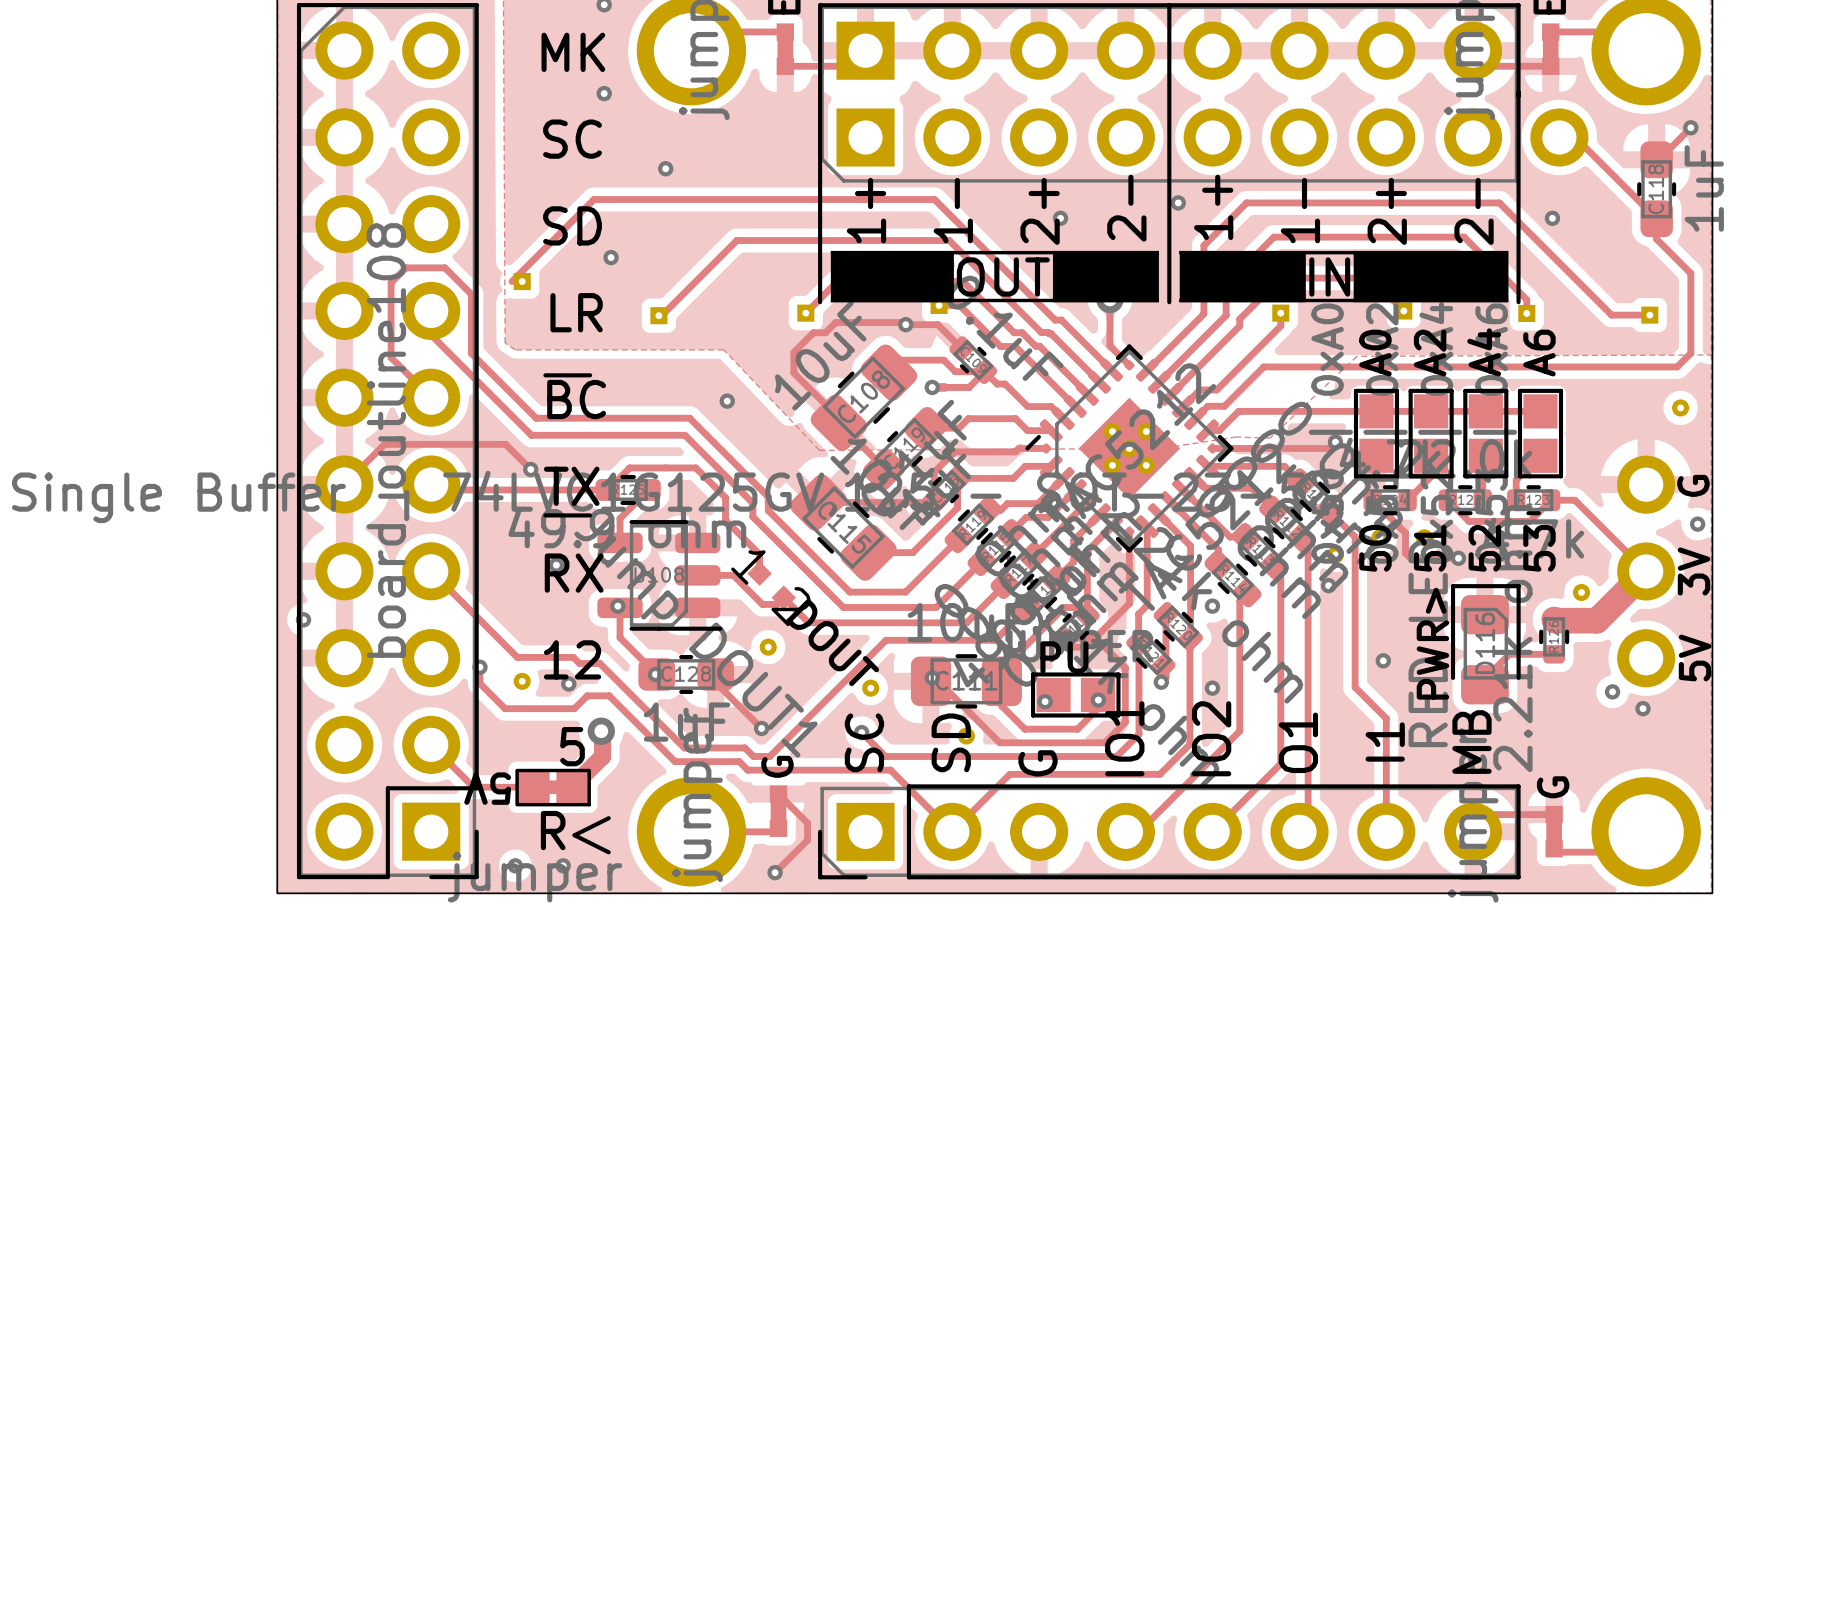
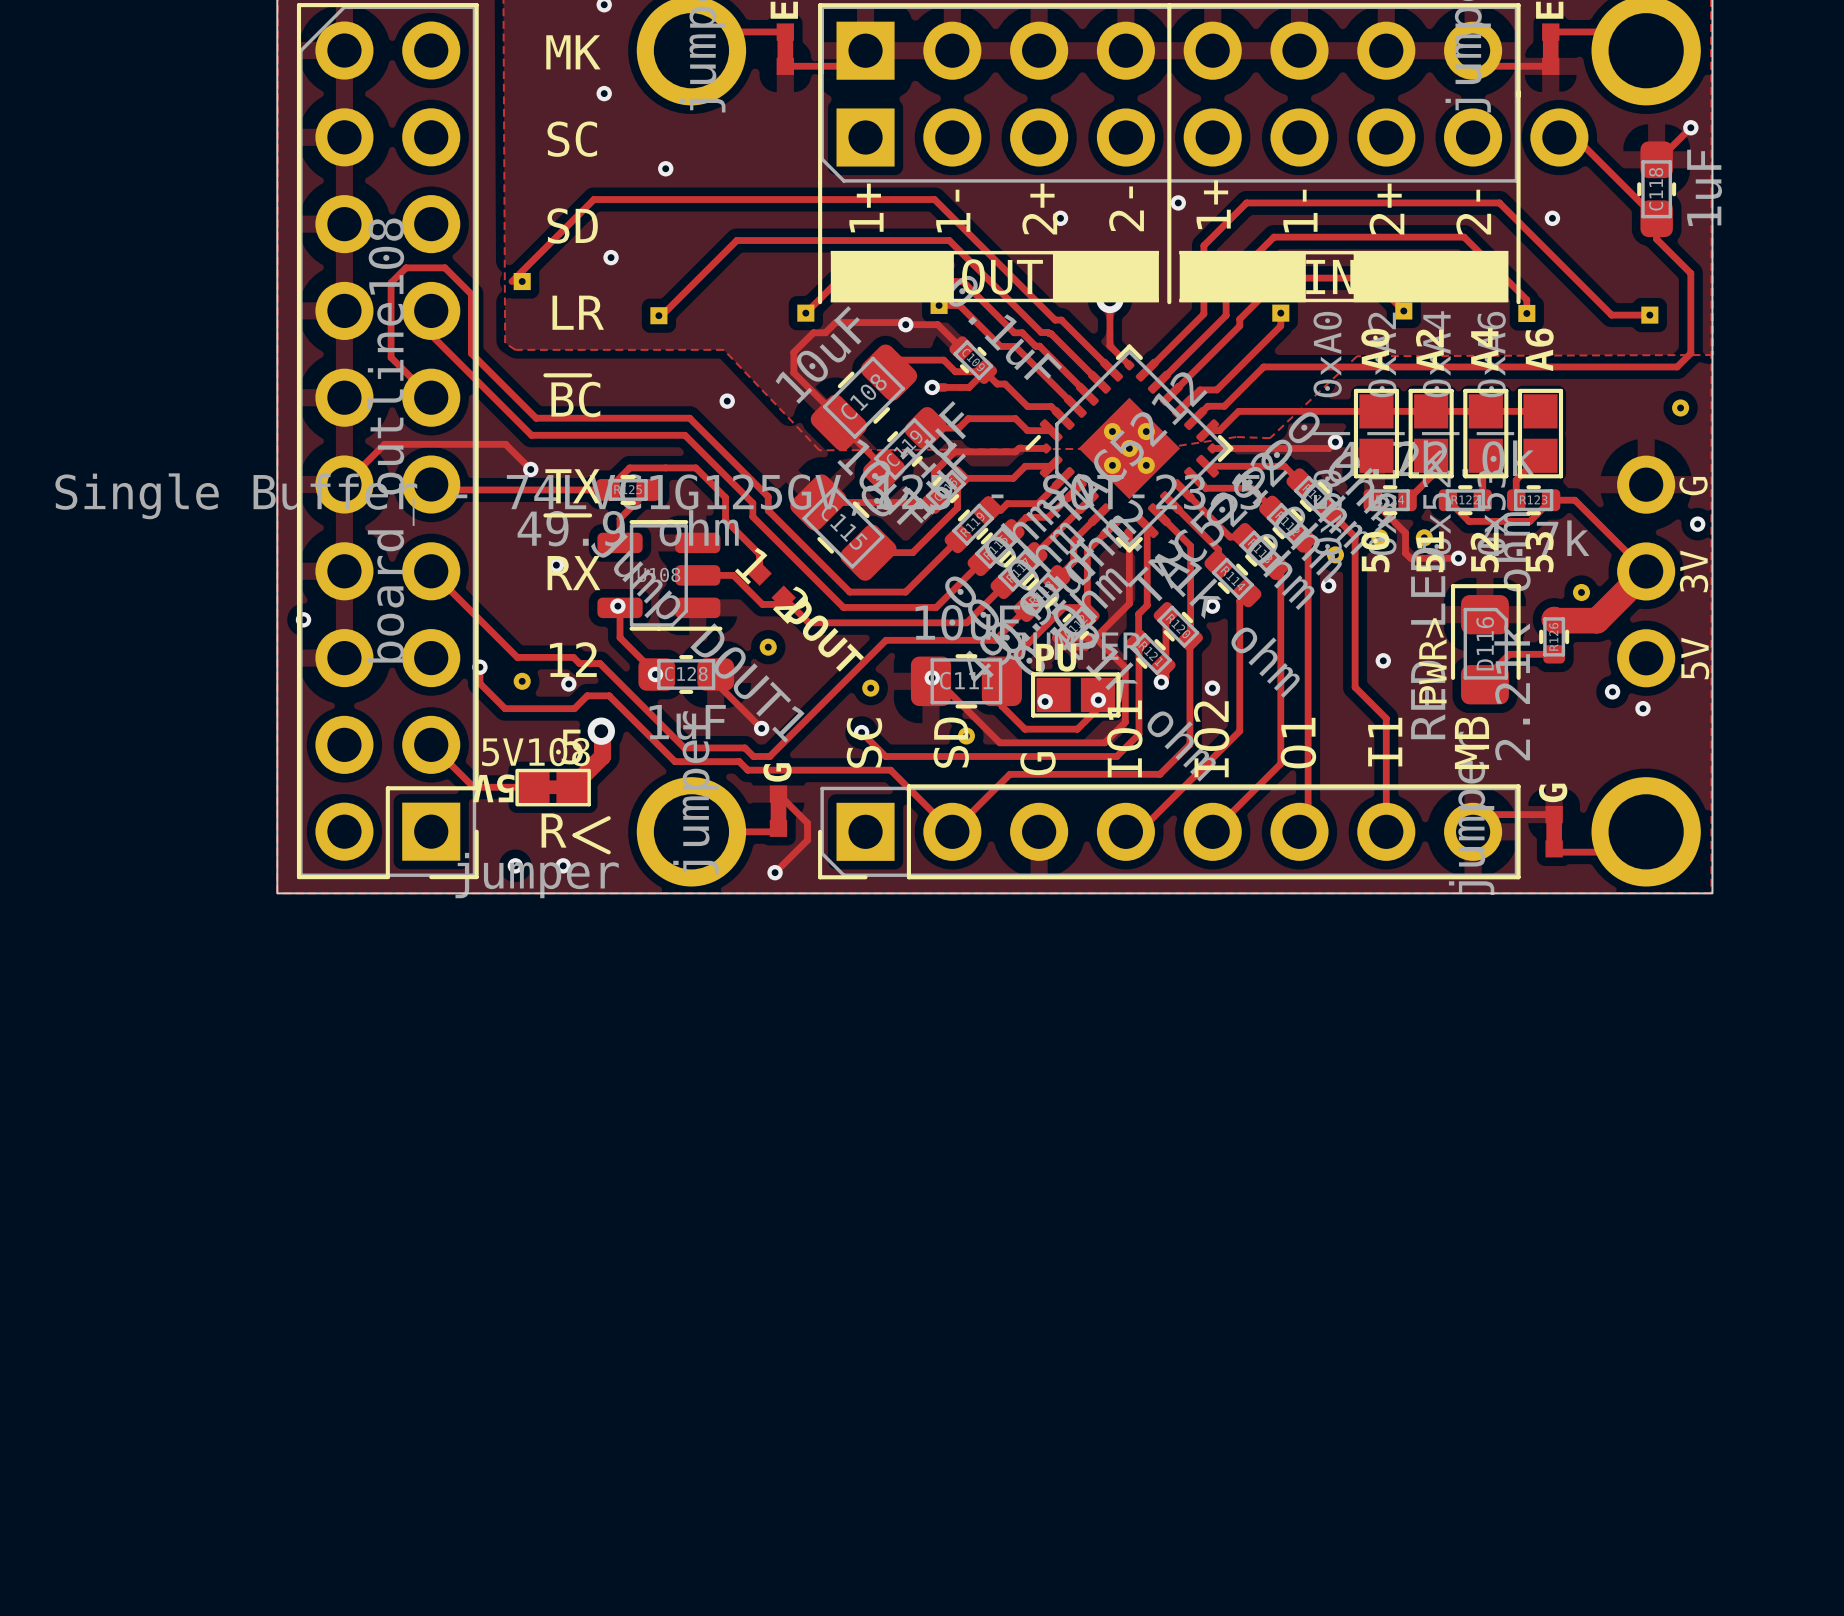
5V108 name: none -> 5V108 (535, 752)

